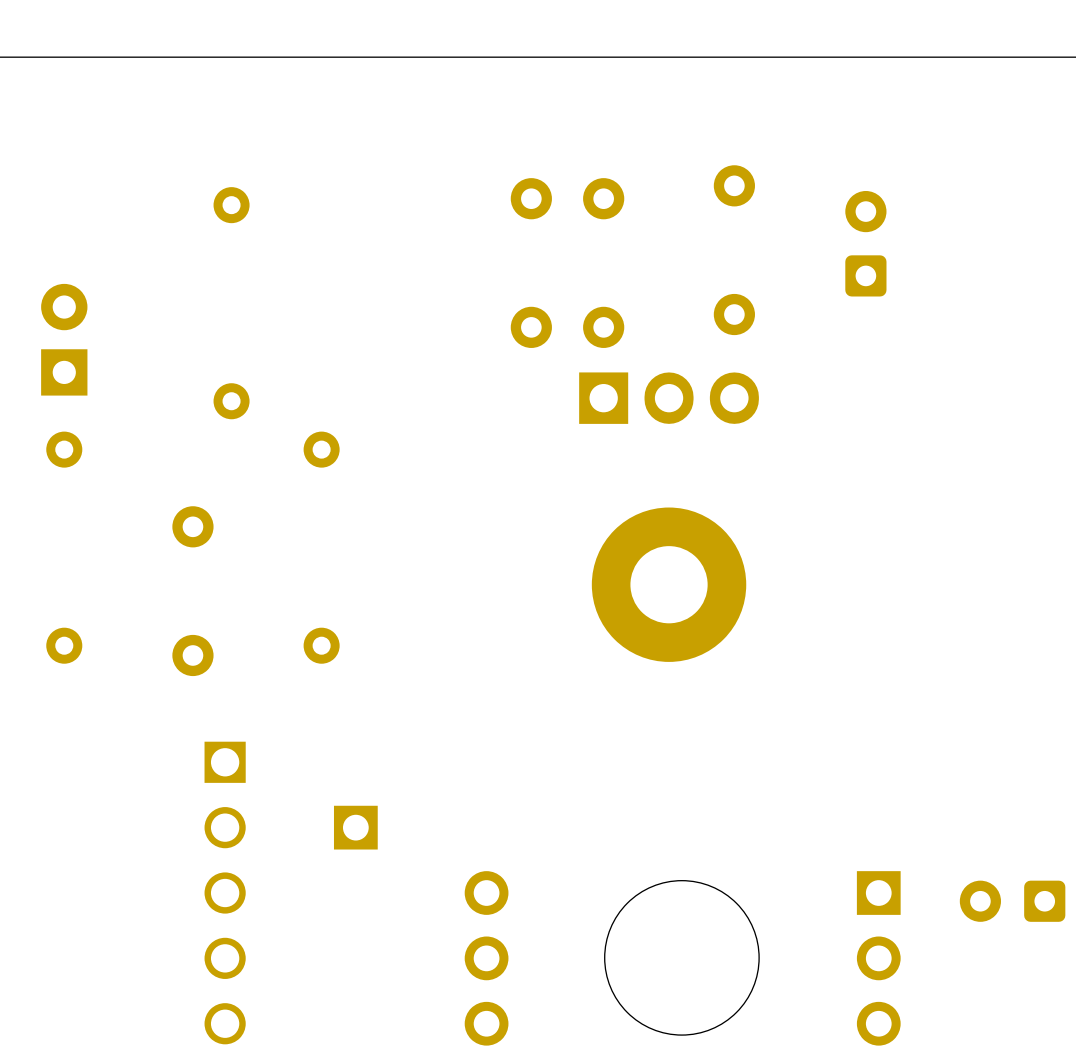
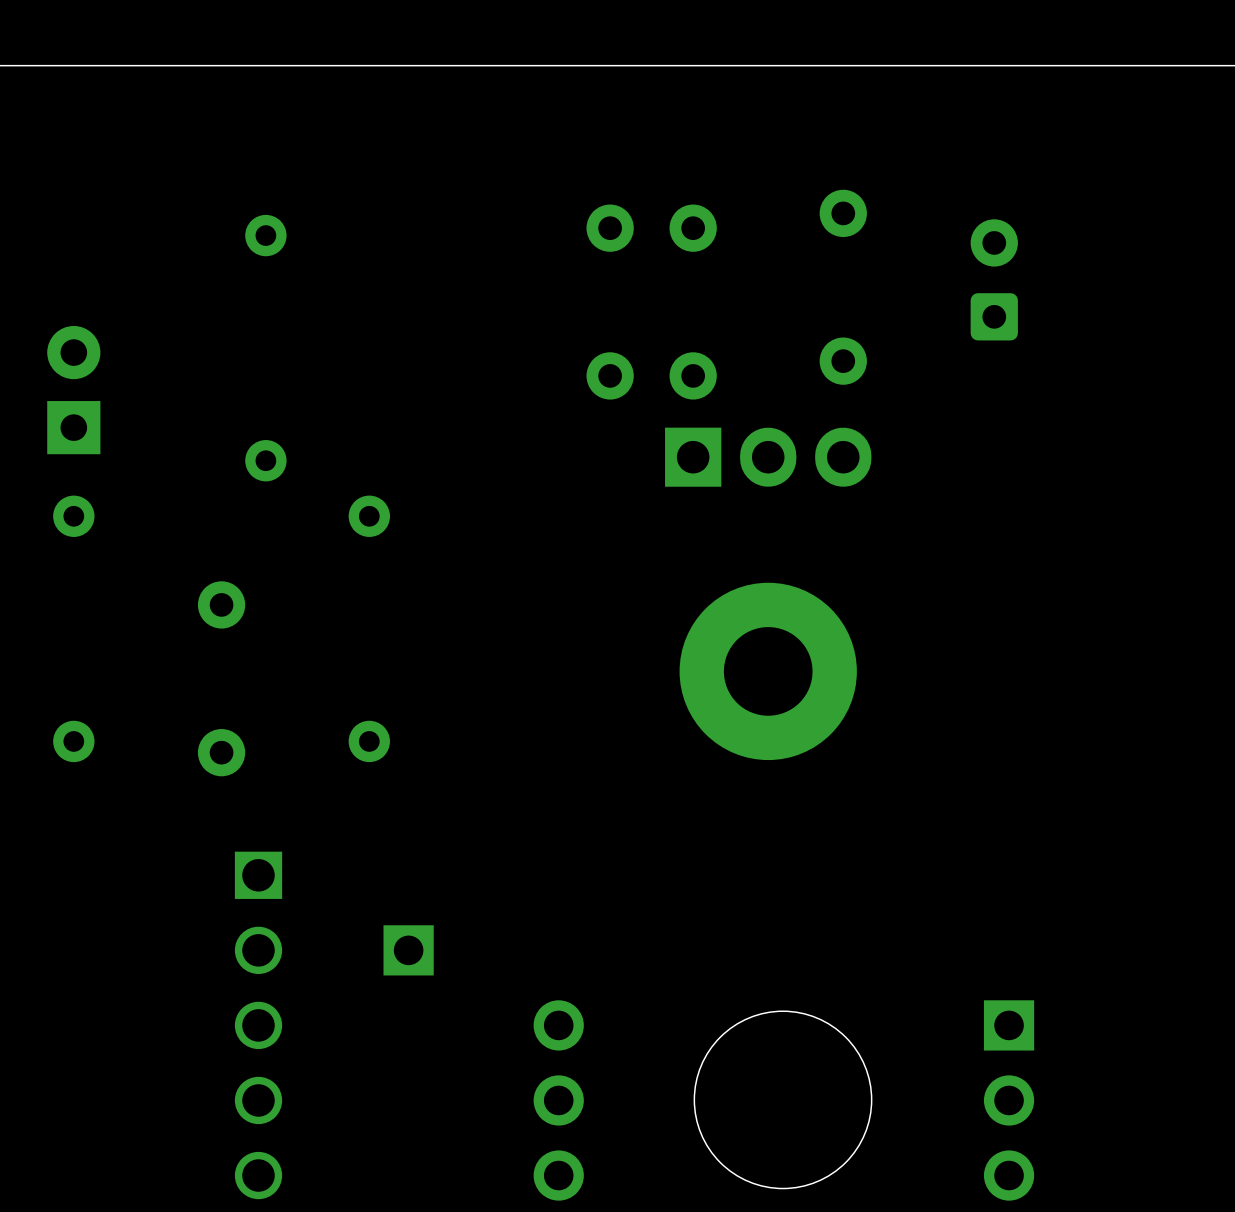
part: (1012, 901) -> none

